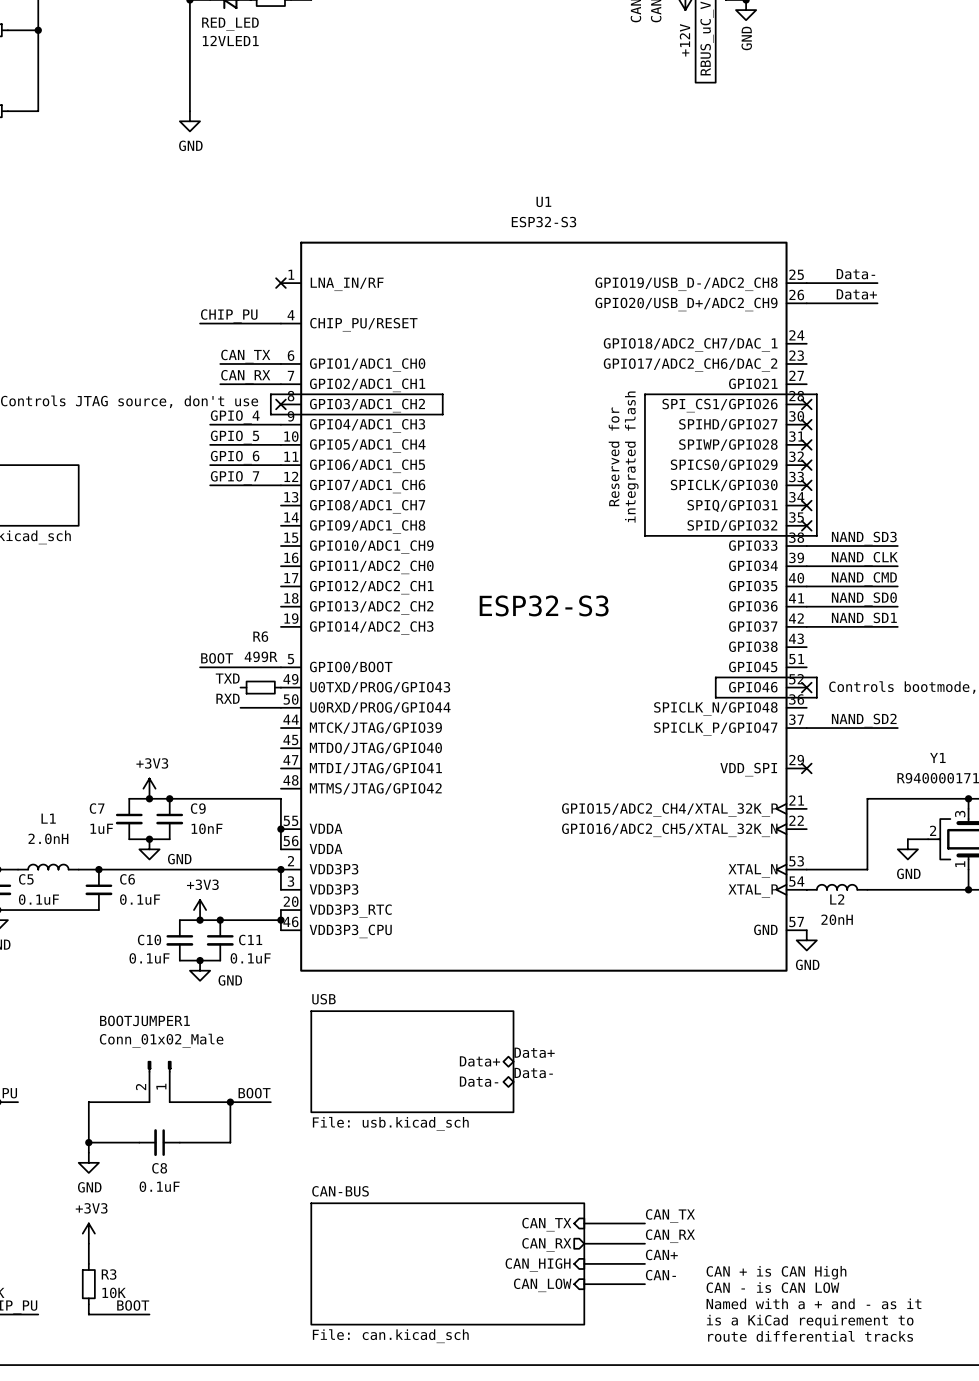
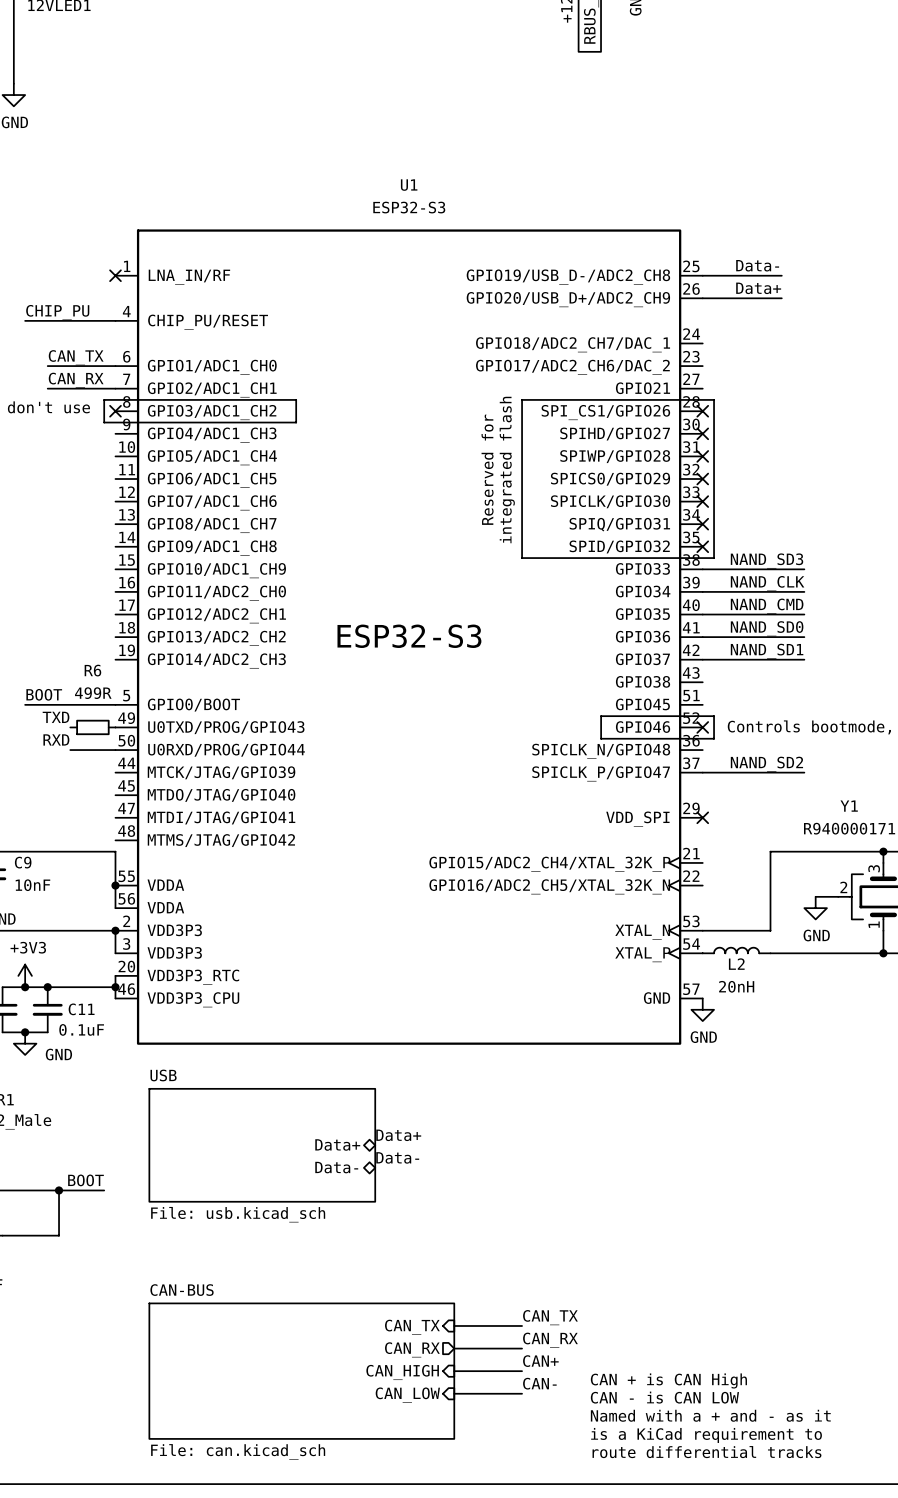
label: GPIO_4 (235, 417) -> none
wire: (210, 424) (280, 424) -> none
label: GPIO_5 (235, 437) -> none
wire: (210, 444) (280, 444) -> none
label: GPIO_6 (235, 457) -> none
wire: (210, 465) (280, 465) -> none
label: GPIO_7 (235, 477) -> none
wire: (210, 485) (280, 485) -> none

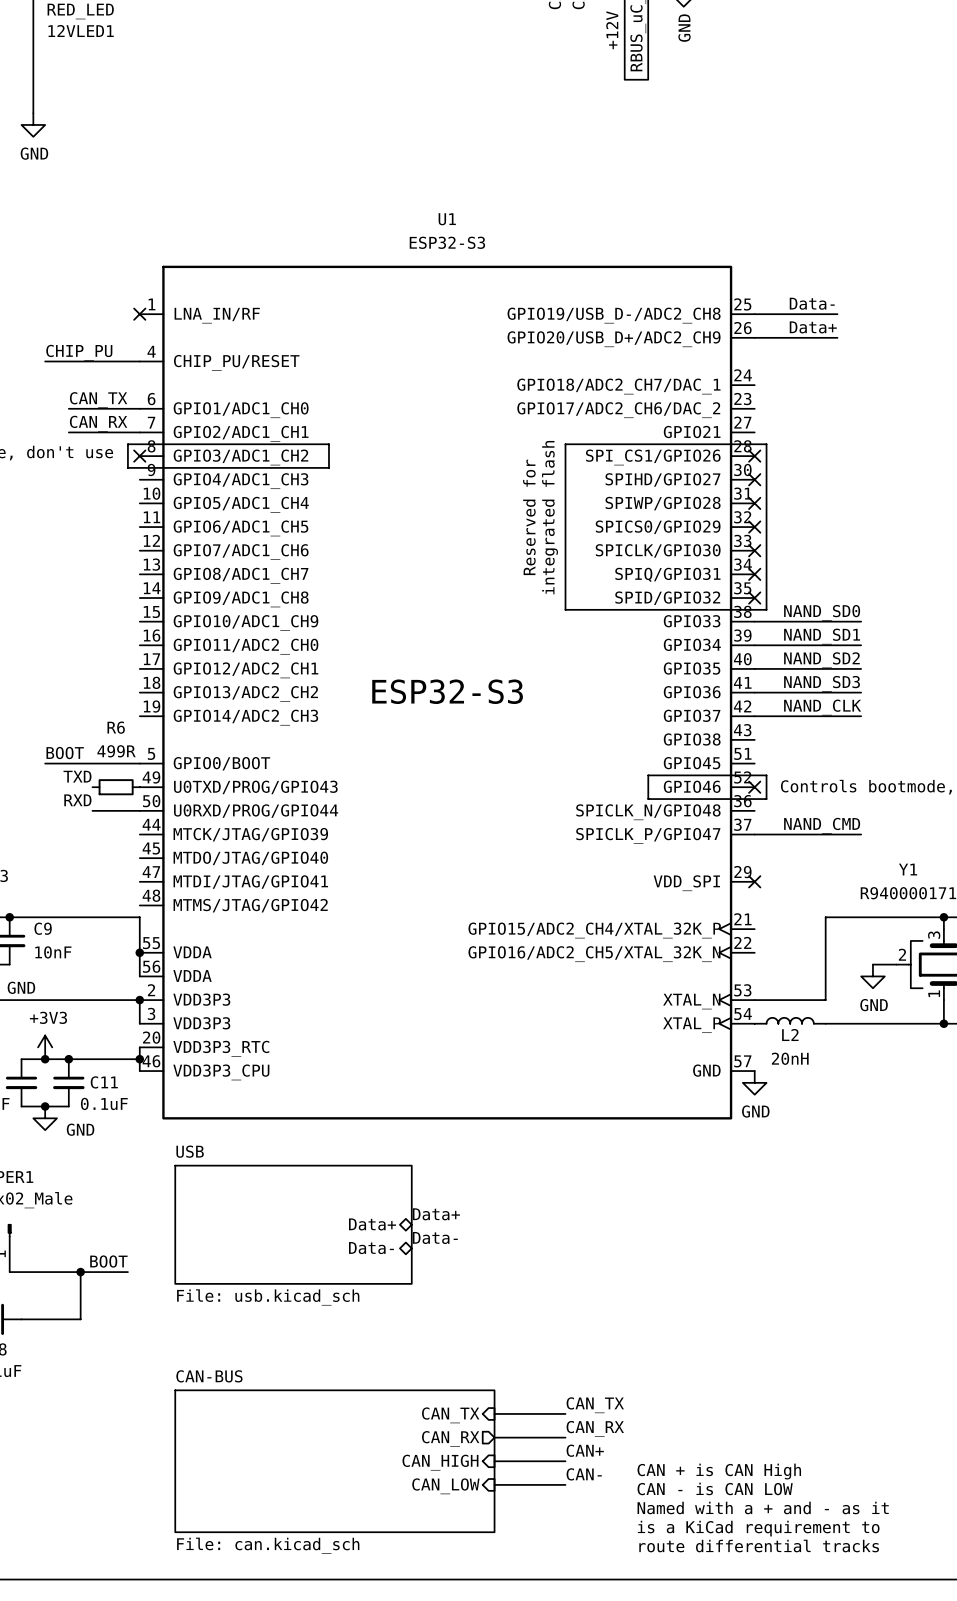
label: NAND_SD3 (767, 560) -> NAND_SD0 (822, 612)
label: NAND_CLK (767, 583) -> NAND_SD1 (822, 636)
label: NAND_CMD (767, 606) -> NAND_SD2 (821, 660)
label: NAND_SD0 (767, 628) -> NAND_SD3 (822, 683)
label: NAND_SD1 (767, 651) -> NAND_CLK (822, 707)
label: NAND_SD2 (766, 764) -> NAND_CMD (822, 825)

